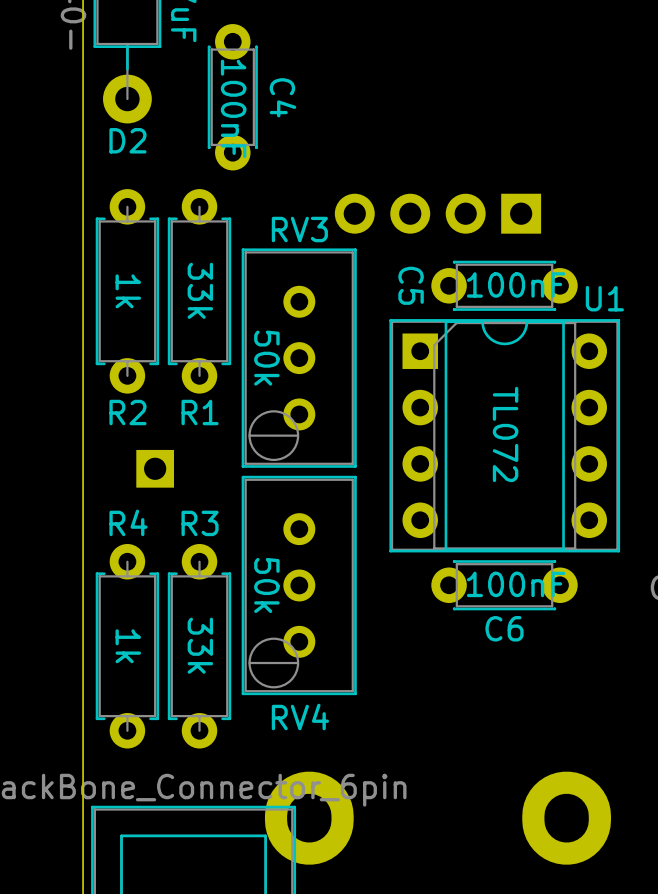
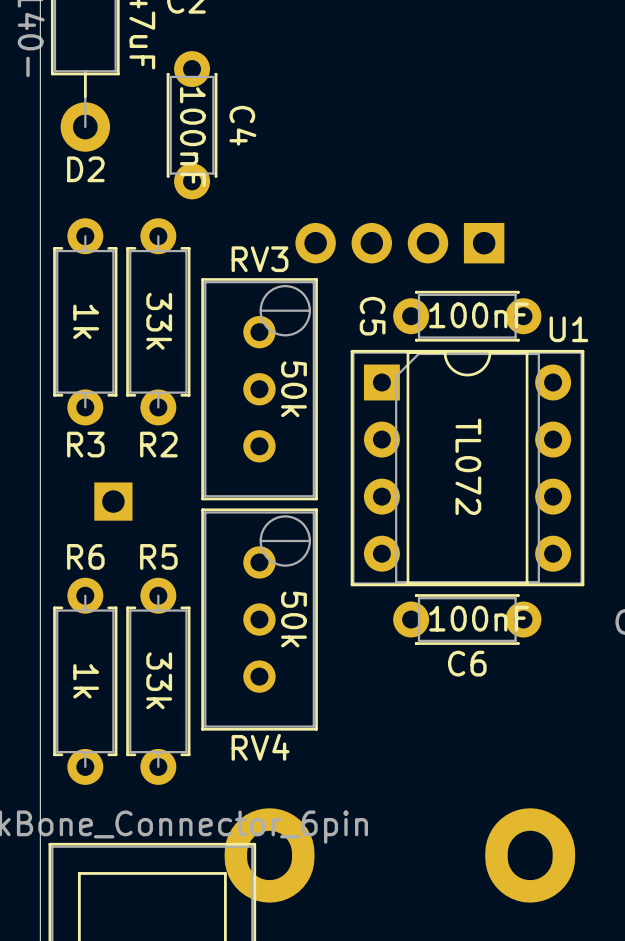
RV3 rotation: 0° (299, 358) -> 180° (259, 389)
R2 name: R2 (127, 412) -> R3 (85, 444)
R1 name: R1 (200, 412) -> R2 (158, 444)
R4 name: R4 (128, 522) -> R6 (85, 556)
R3 name: R3 (200, 523) -> R5 (158, 556)
RV4 rotation: 0° (299, 585) -> 180° (259, 619)

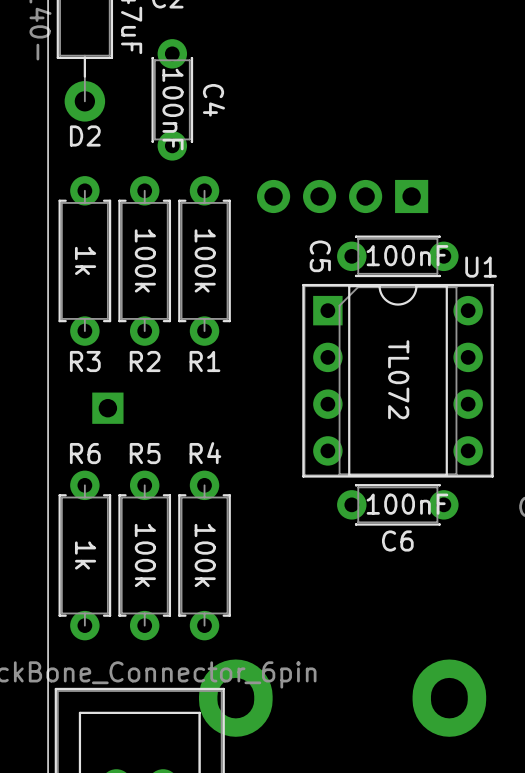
R2 value: 33k (159, 321) -> 100k (145, 260)
R1: none -> 100k (204, 260)
RV3: 50k (259, 389) -> none
RV4: 50k (259, 619) -> none
R5 value: 33k (159, 680) -> 100k (145, 555)
R4: none -> 100k (204, 555)

